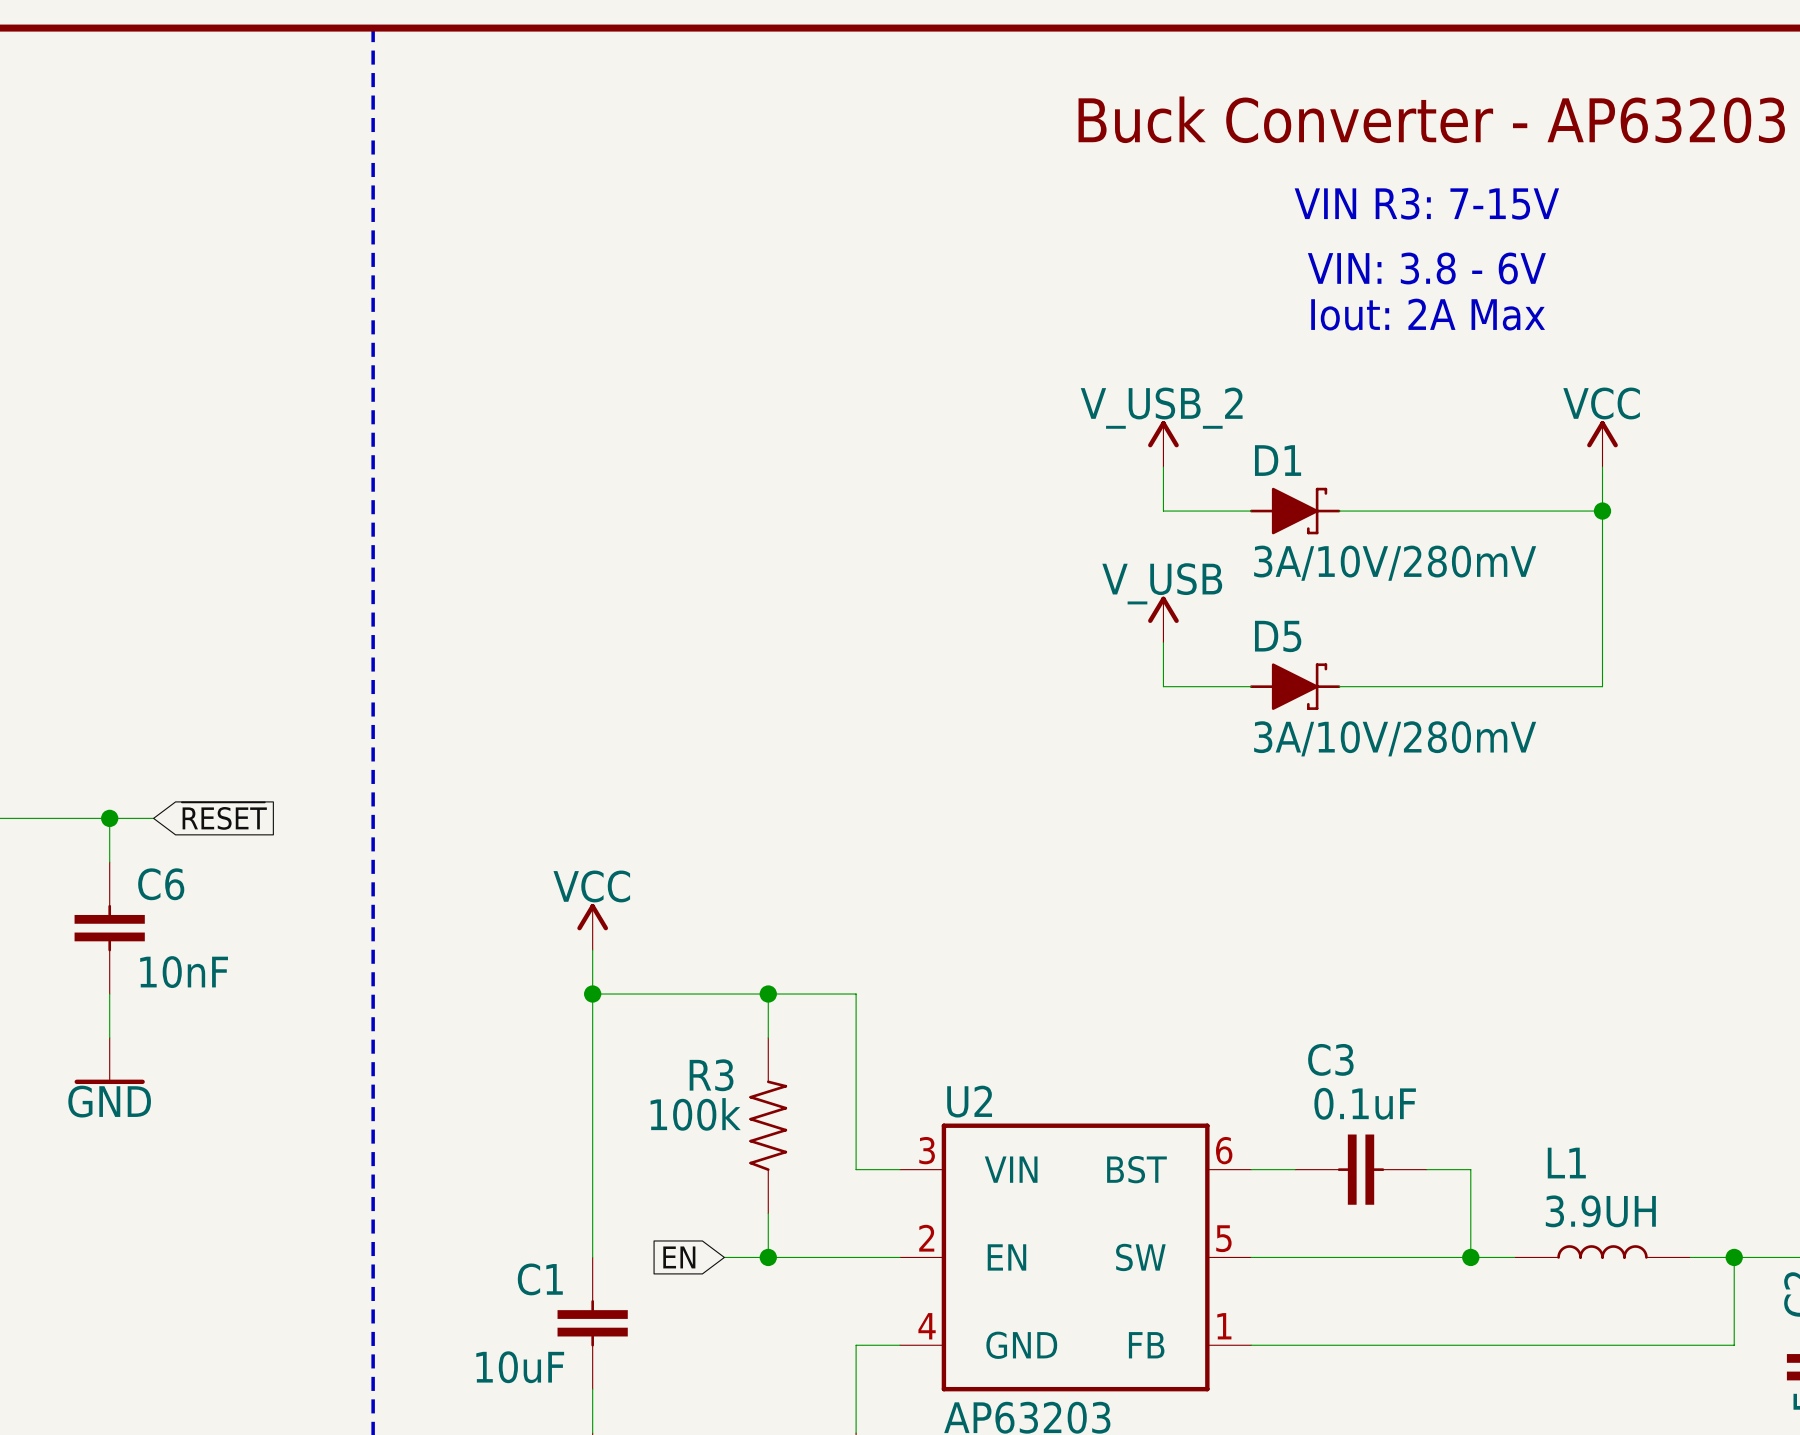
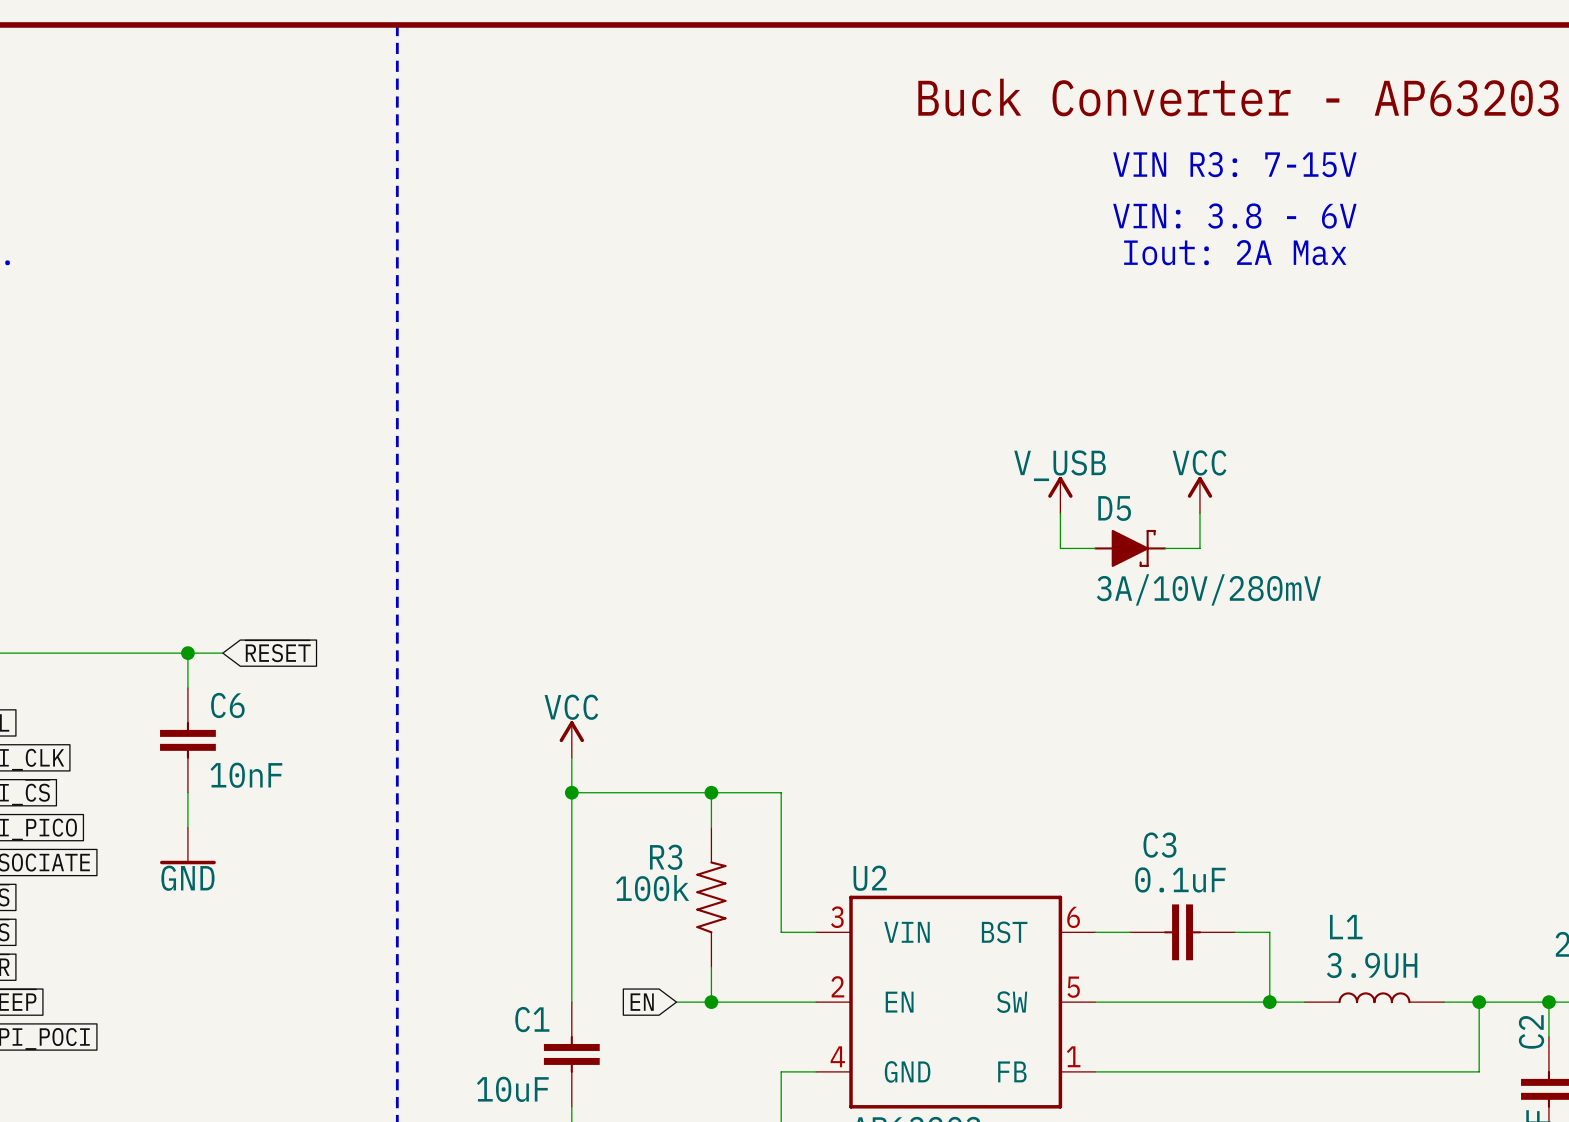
power symbol: V_USB_2 (1163, 444) -> none
power symbol position: VCC (1602, 444) -> VCC (1199, 495)
wire: (1163, 467) (1163, 511) (1251, 511) -> none
wire: (1602, 467) (1602, 686) (1382, 686) -> (1199, 513) (1199, 548)
D1: 3A/10V/280mV (1295, 511) -> none
wire: (1339, 511) (1602, 511) -> none
junction: (1602, 511) -> none
power symbol position: V_USB (1163, 619) -> V_USB (1060, 495)
wire: (1163, 642) (1163, 686) (1207, 686) -> (1060, 513) (1060, 548)

